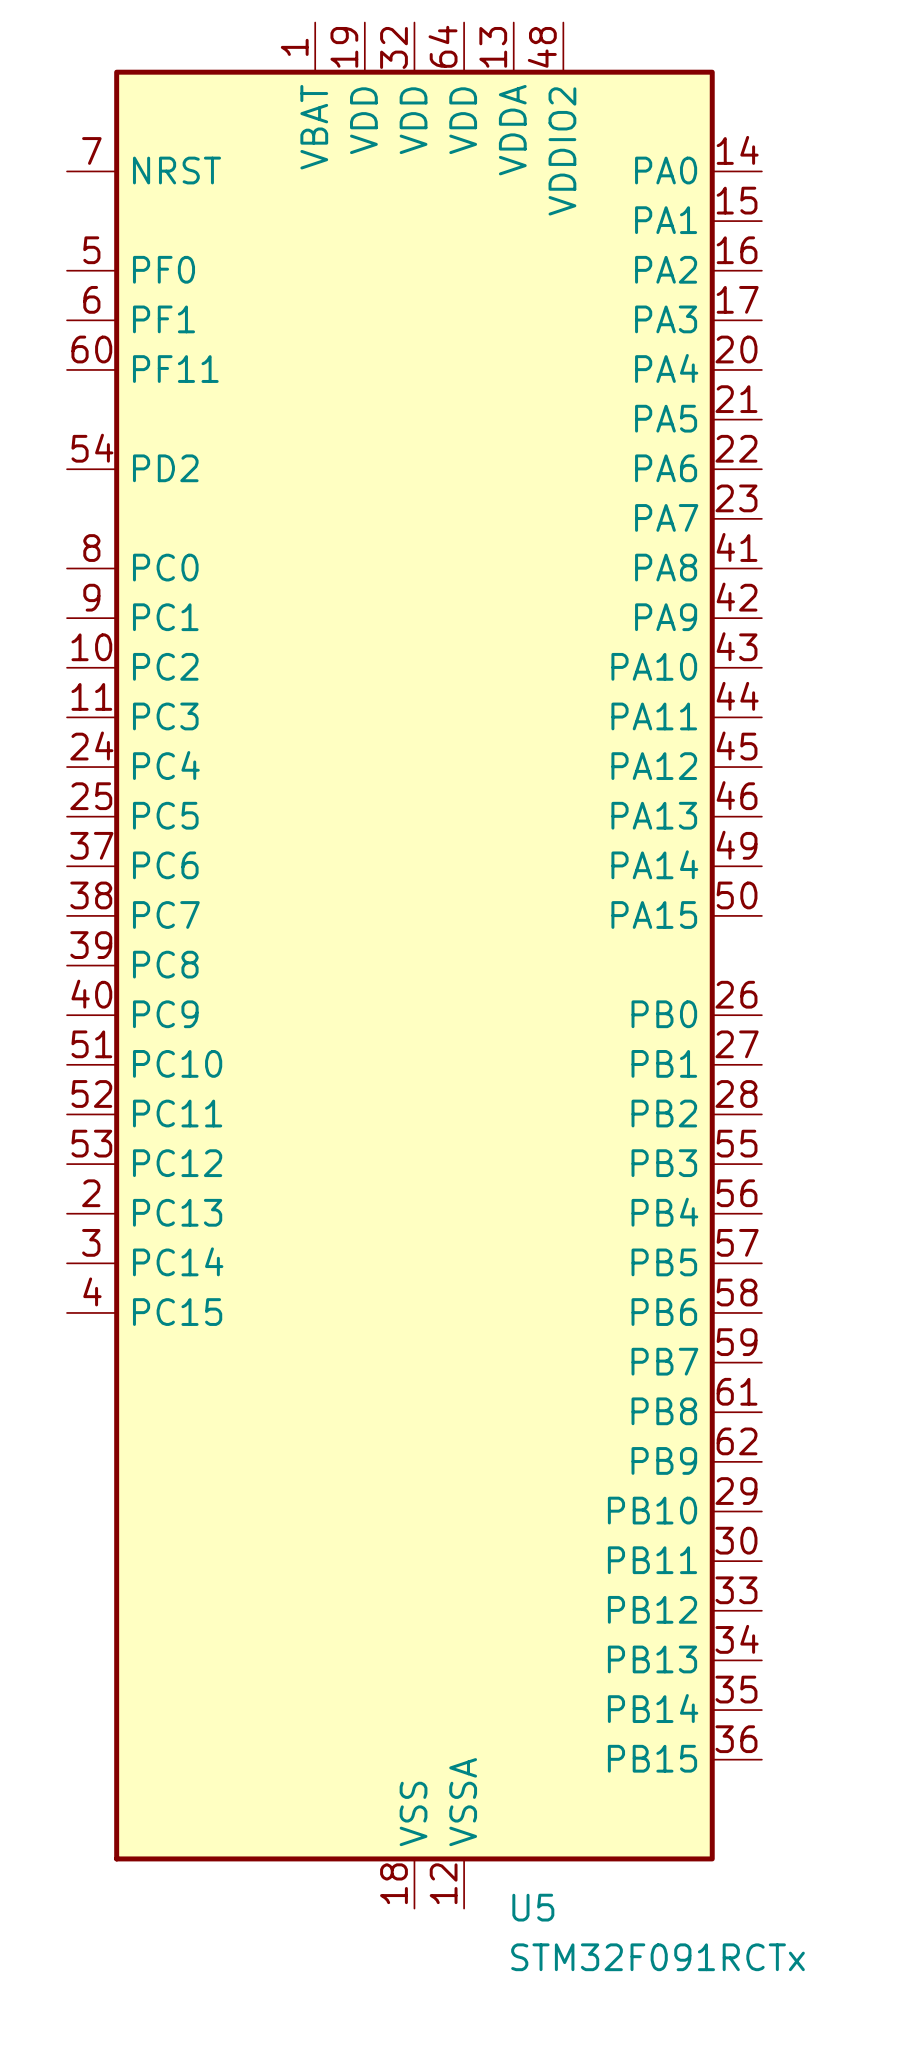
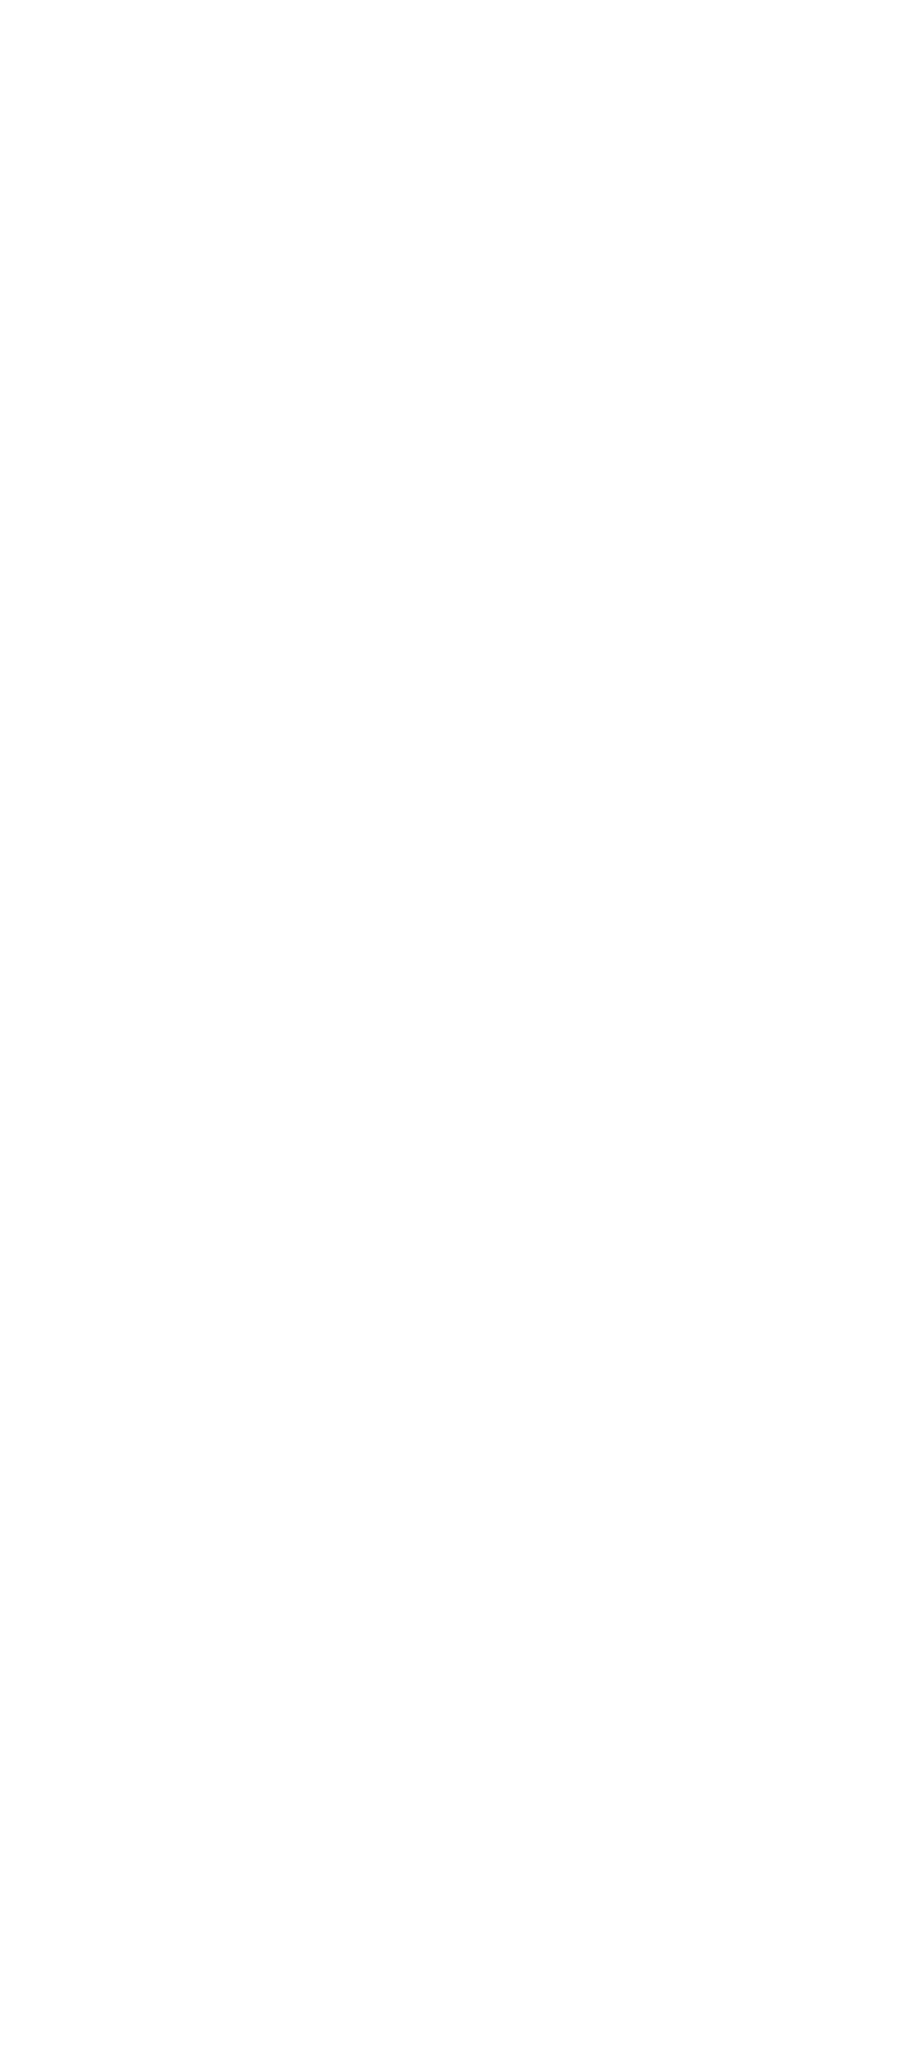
U5: STM32F091RCTx (414, 965) -> none

